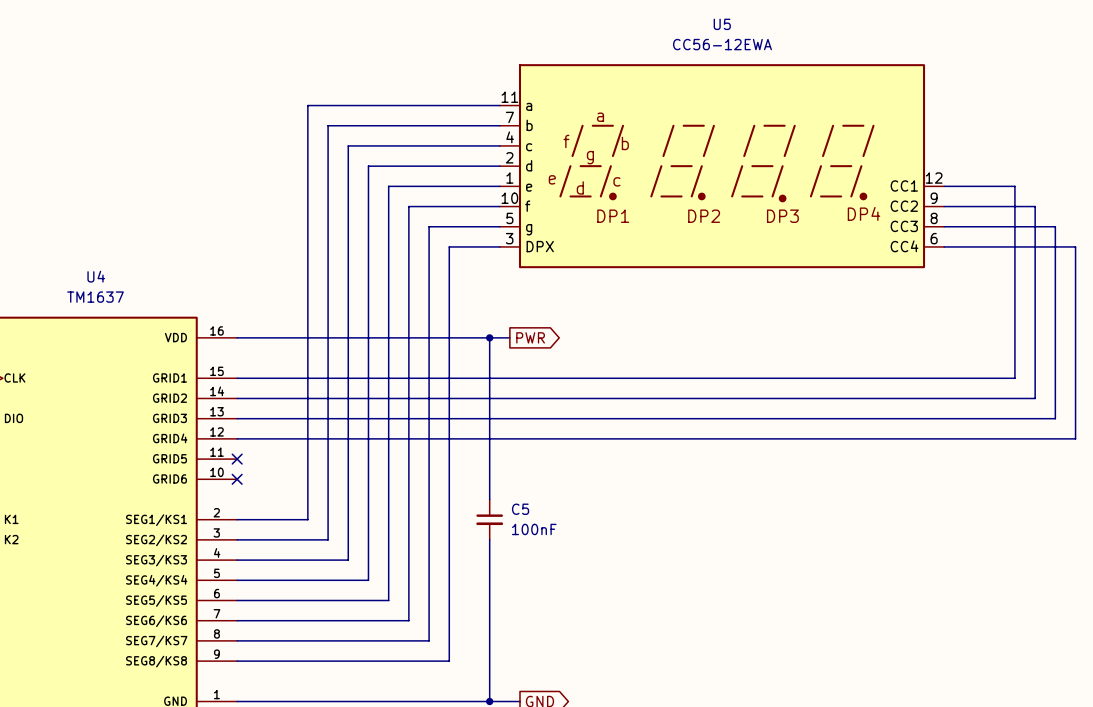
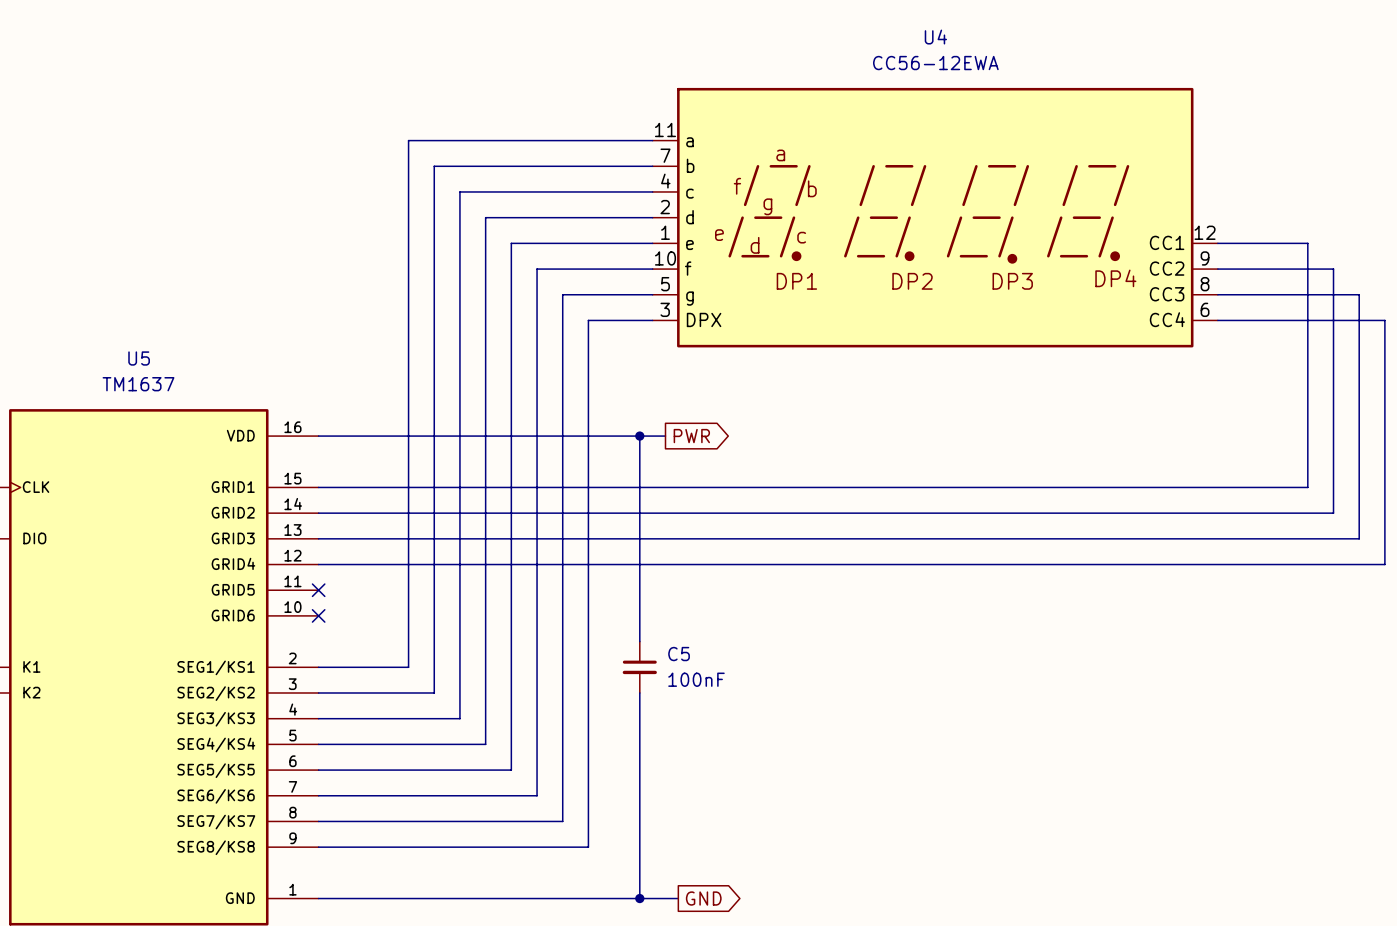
U5 name: U5 (722, 24) -> U4 (935, 37)
U4 name: U4 (96, 276) -> U5 (139, 358)

